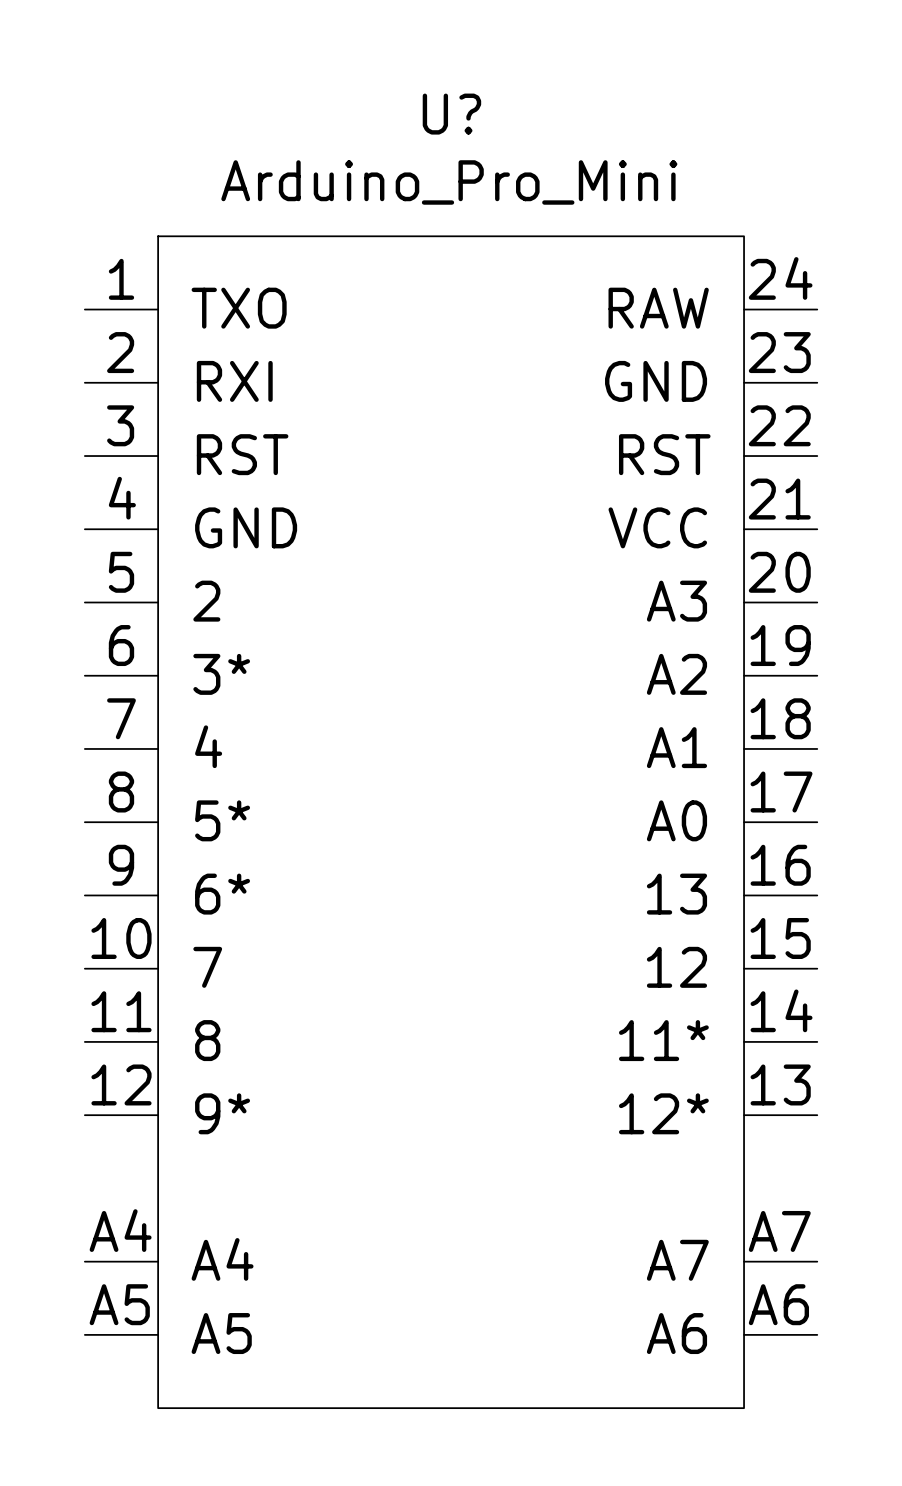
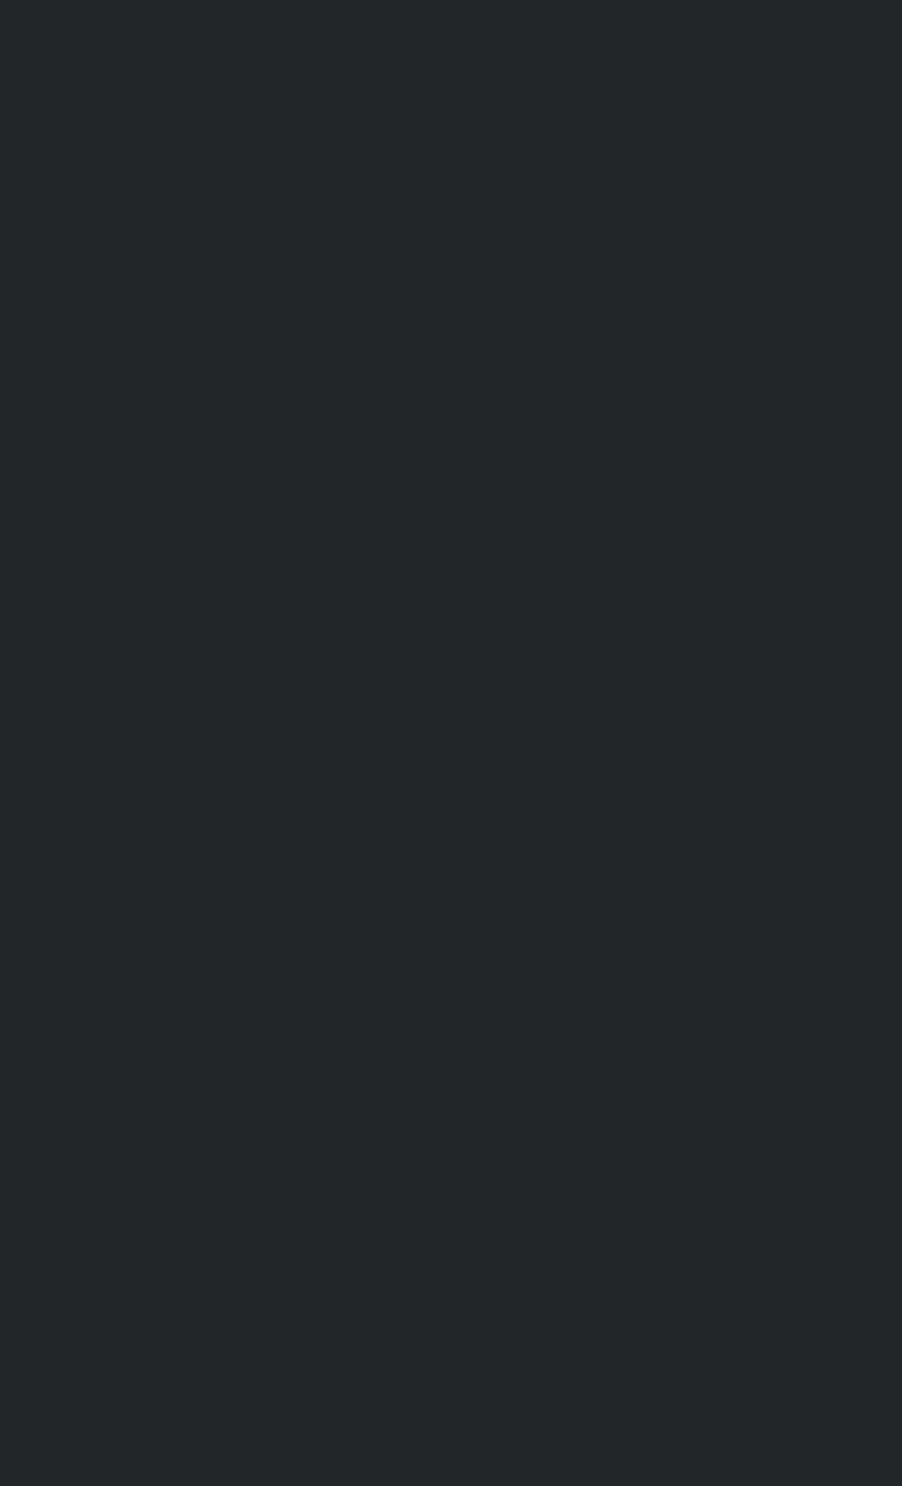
U?: Arduino_Pro_Mini (451, 822) -> none

